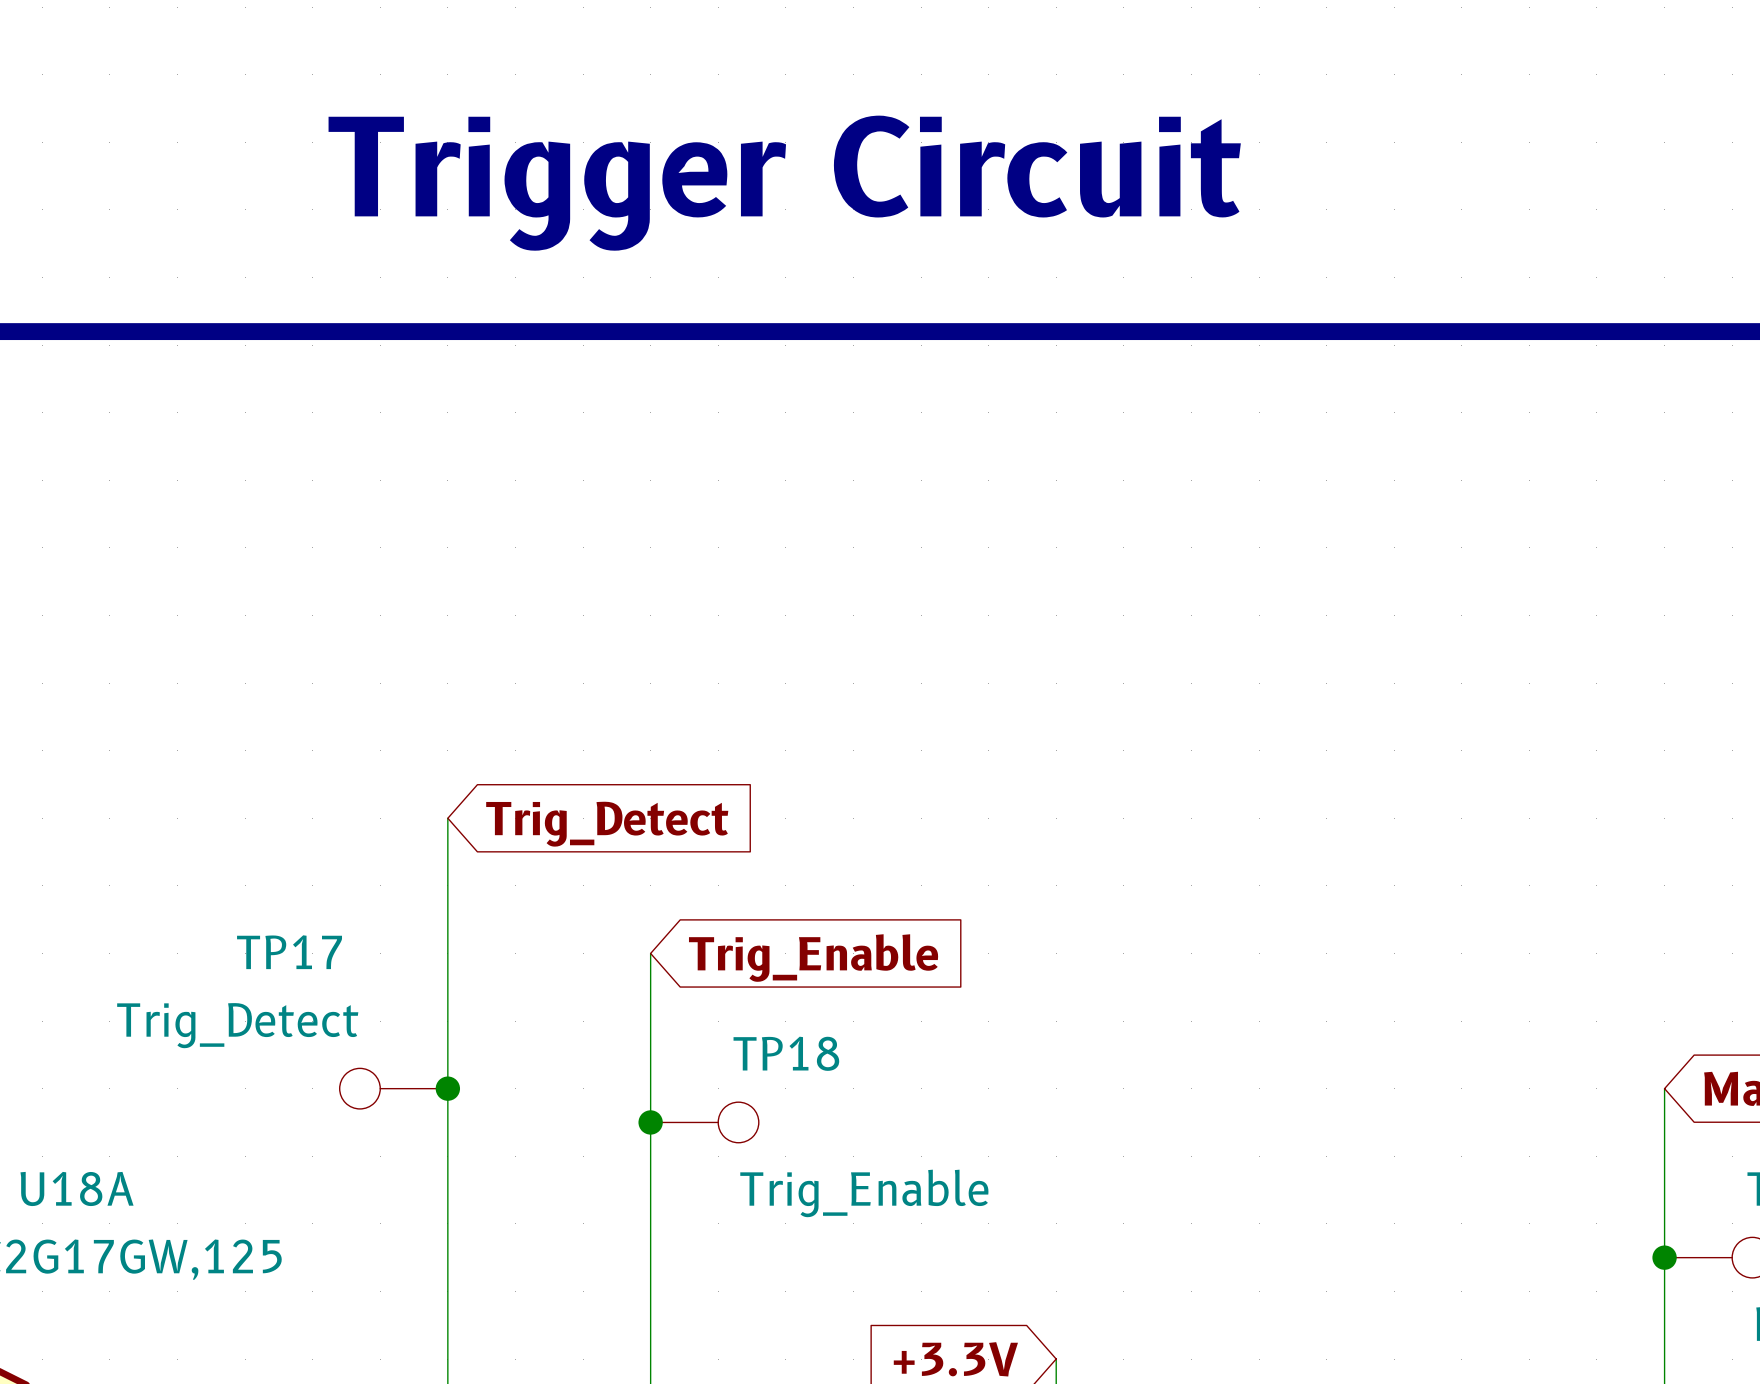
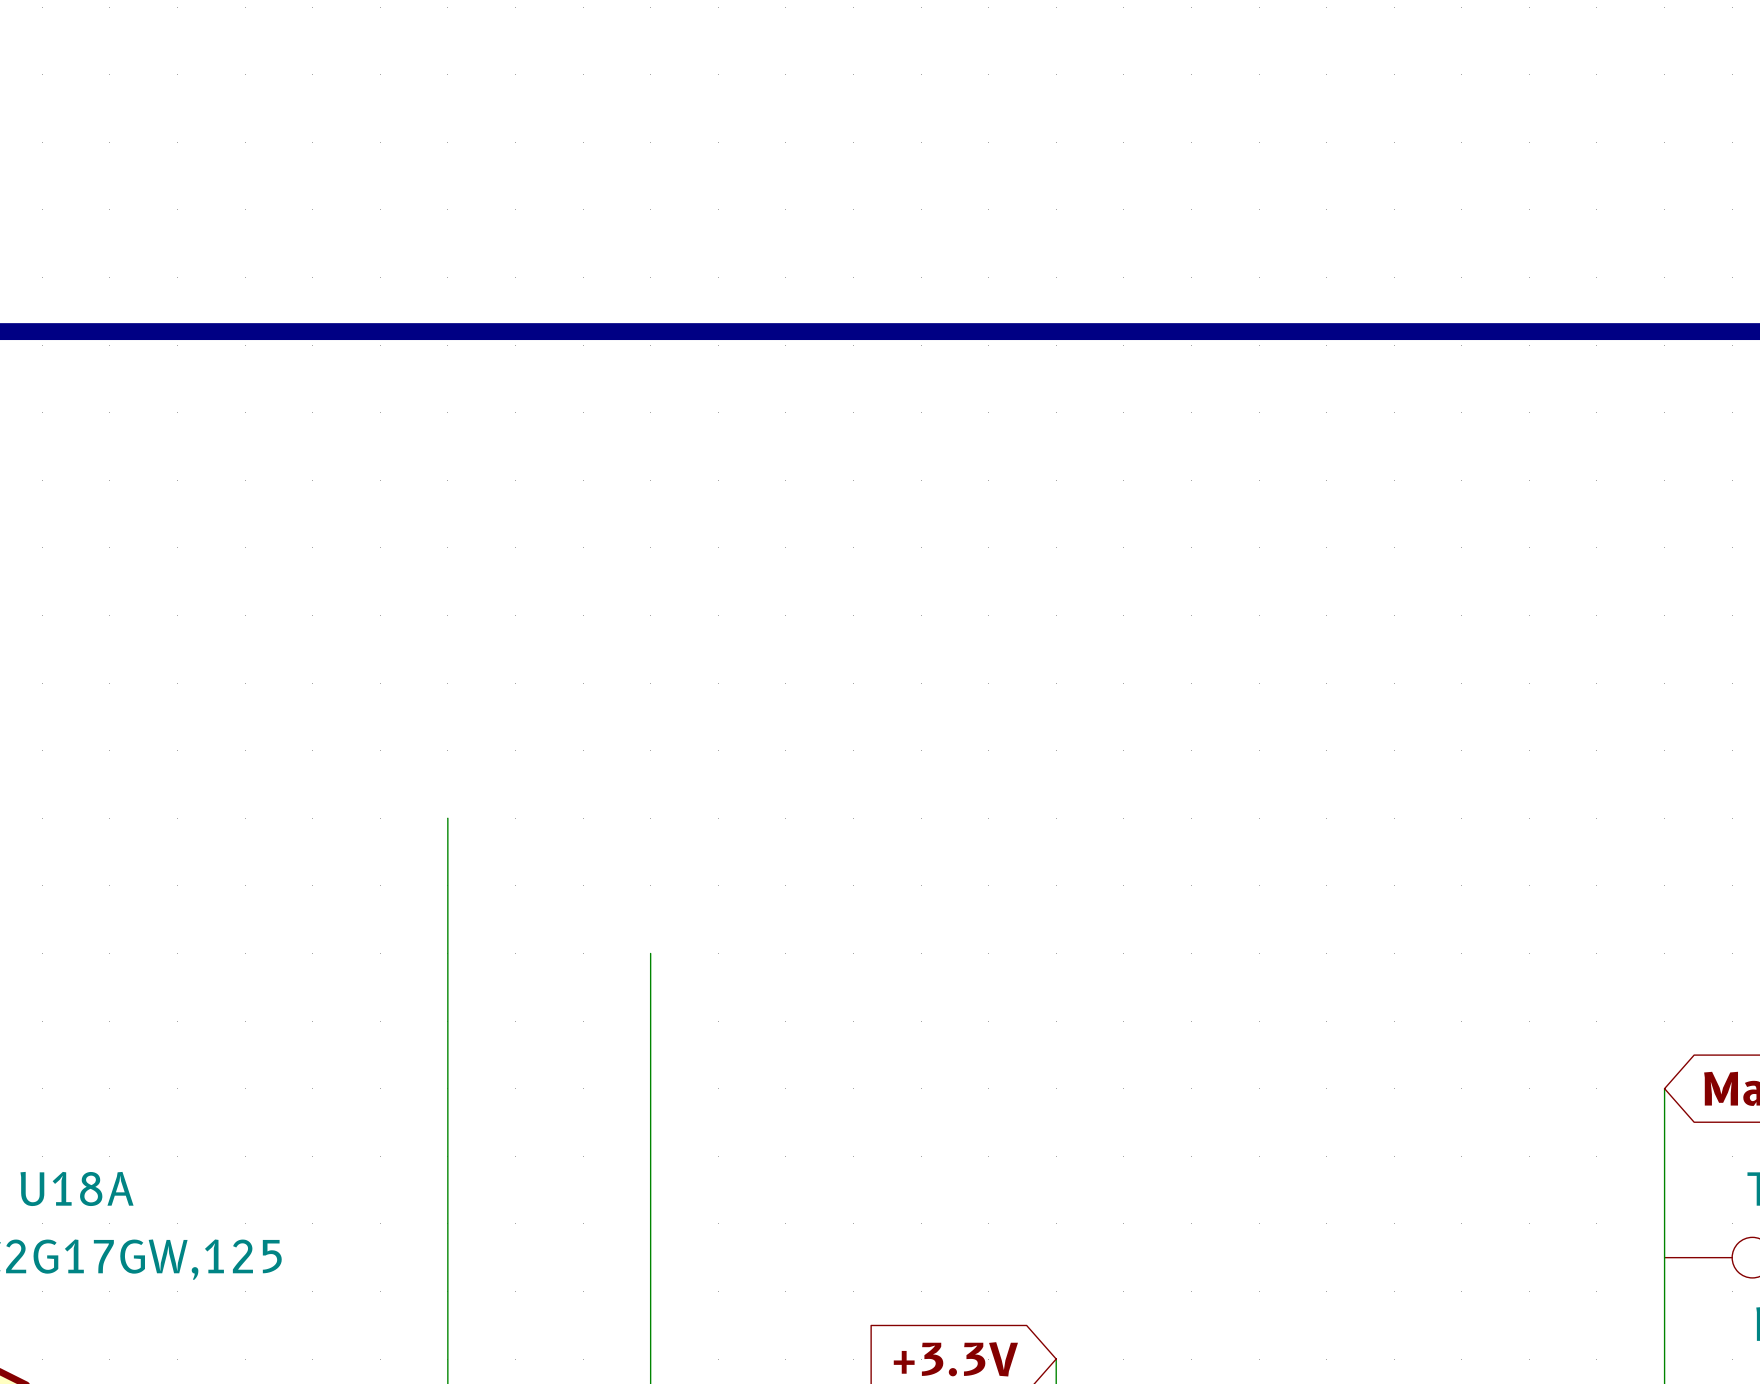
text: Trigger Circuit (784, 183) -> none
global label: Trig_Detect (607, 824) -> none
global label: Trig_Enable (813, 958) -> none
TP17: Trig_Detect (393, 1088) -> none
junction: (447, 1088) -> none
junction: (650, 1122) -> none
TP18: Trig_Enable (704, 1122) -> none
junction: (1664, 1257) -> none

